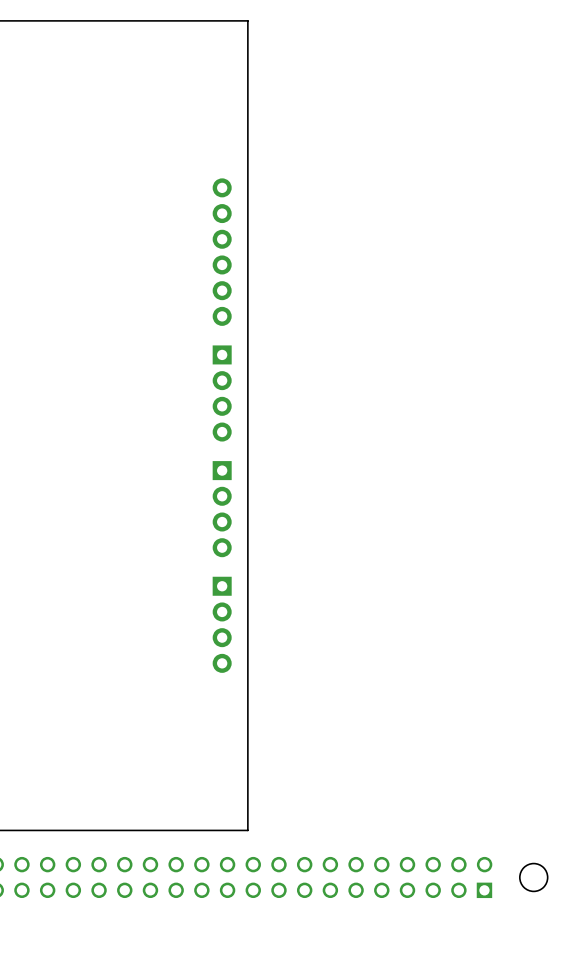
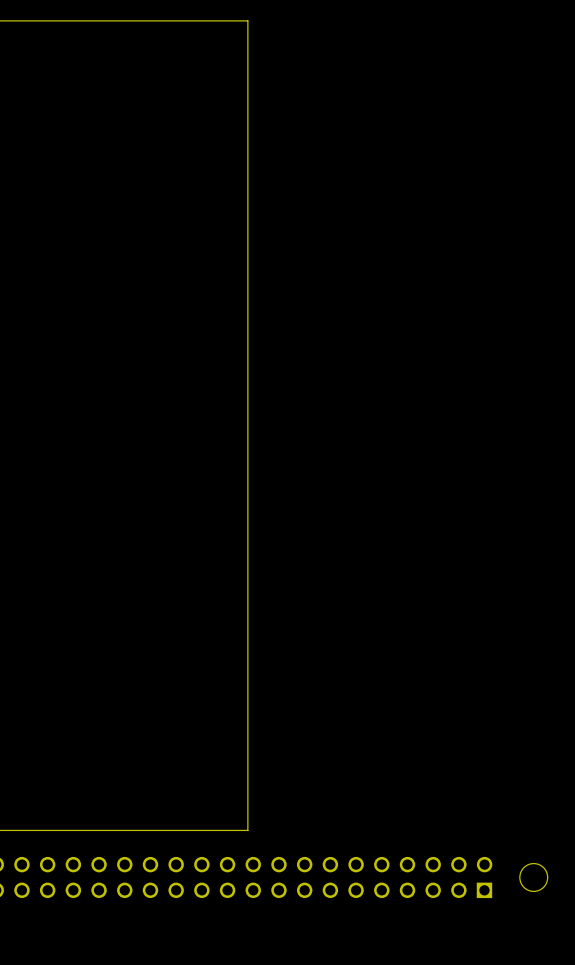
part: (222, 252) -> none
part: (222, 393) -> none
part: (222, 509) -> none
part: (222, 624) -> none

